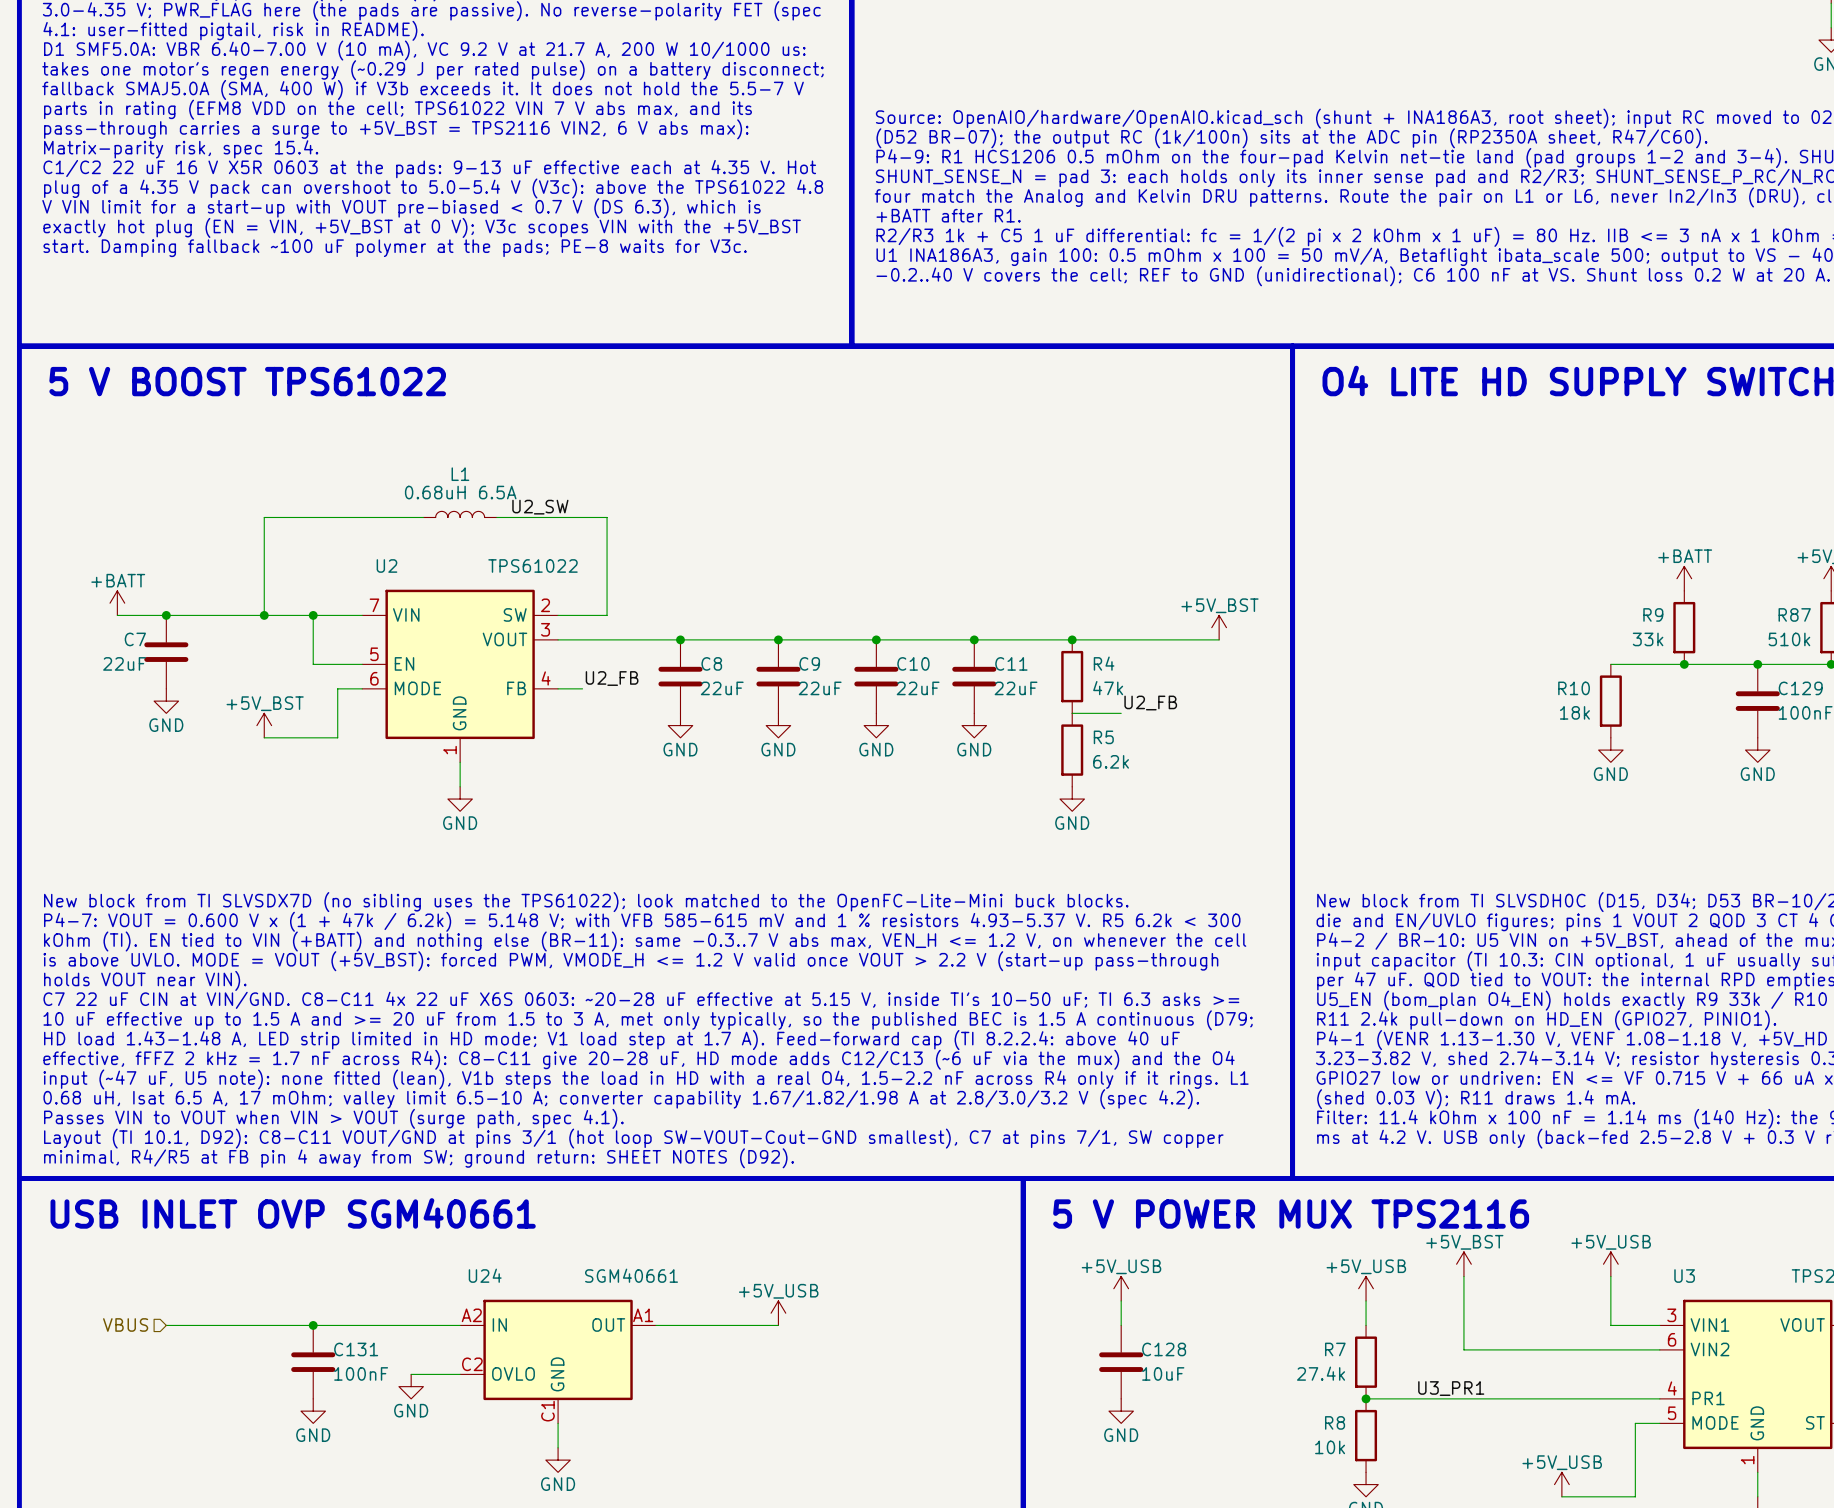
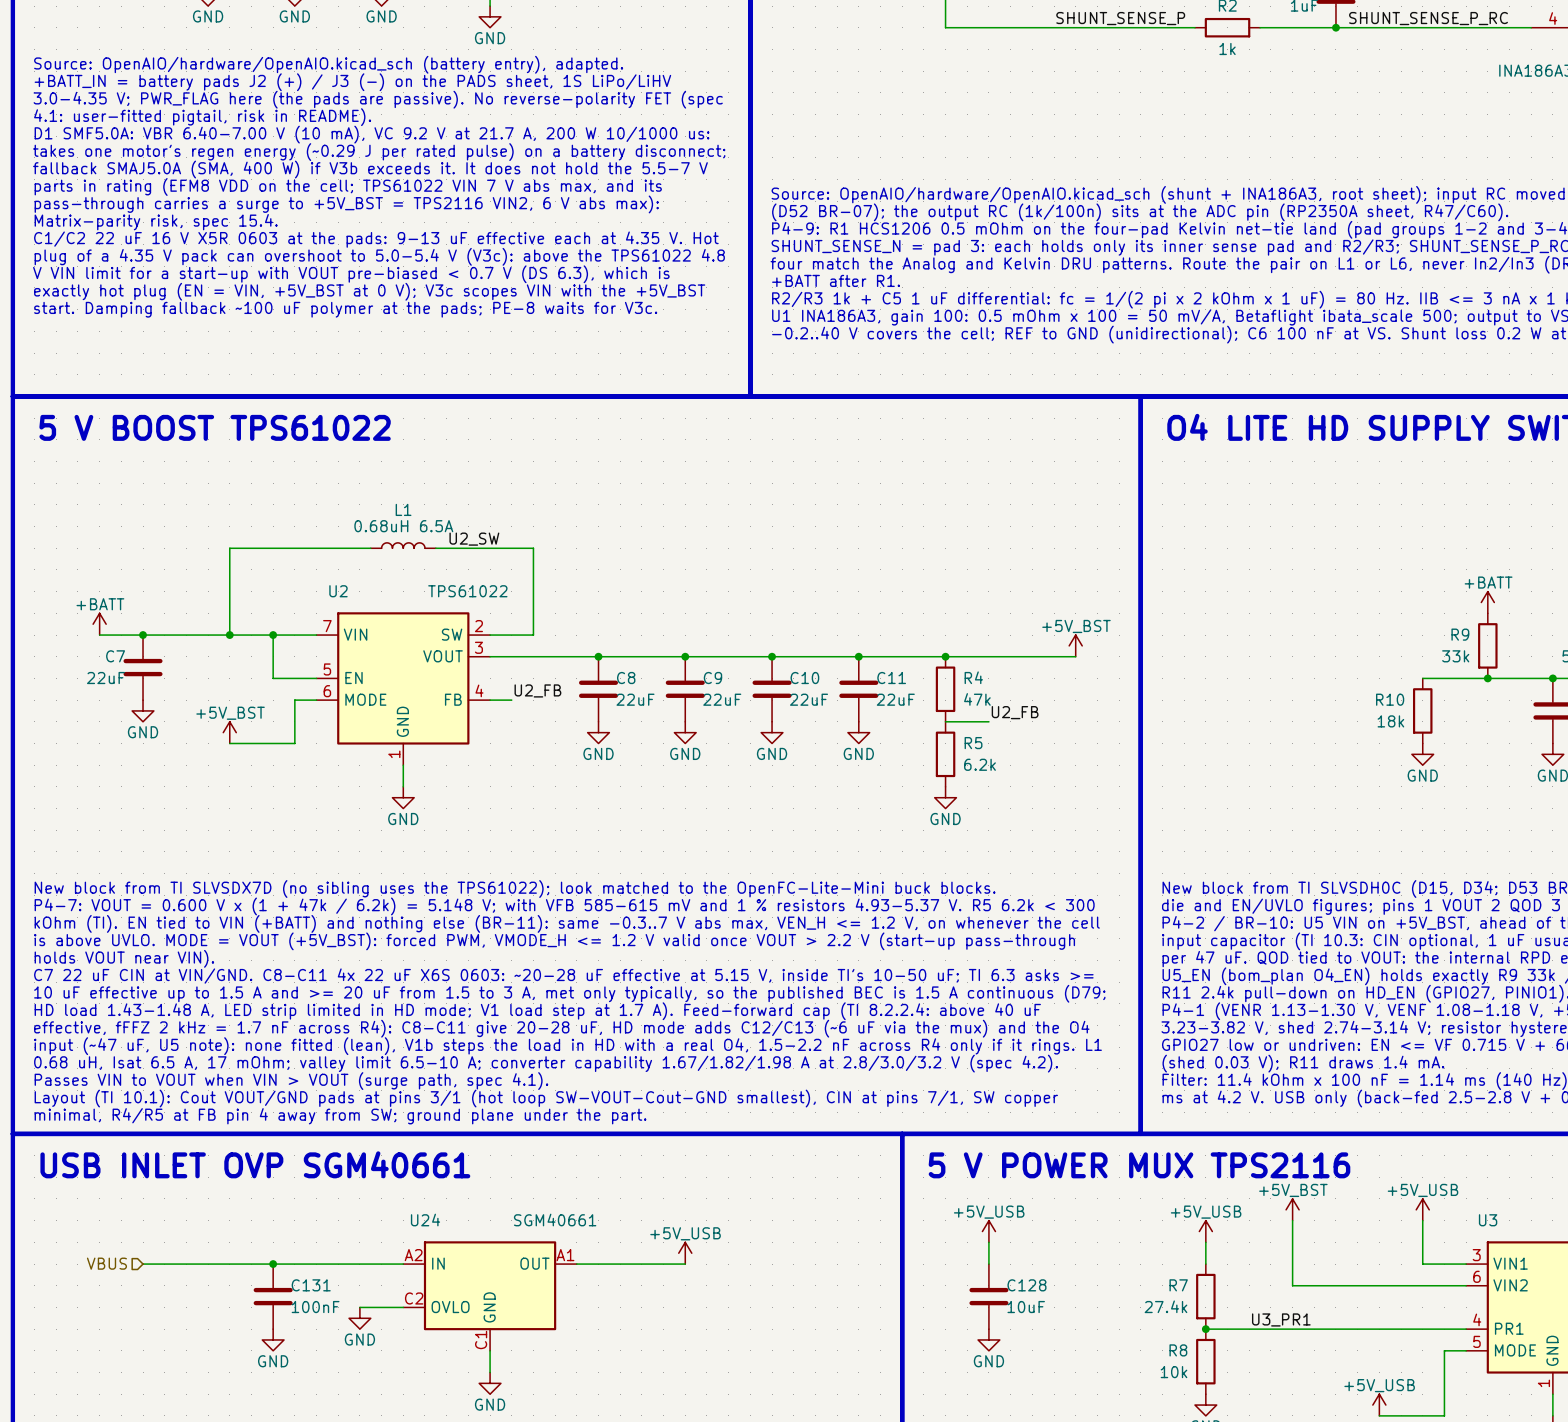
text: Layout (TI 10.1, D92): C8-C11 VOUT/GND at pins 3/1 (hot loop SW-VOUT-Cout-GND smallest), C7 at pins 7/1, SW copper (633, 1138) -> Layout (TI 10.1): Cout VOUT/GND pads at pins 3/1 (hot loop SW-VOUT-Cout-GND smallest), CIN at pins 7/1, SW copper (546, 1098)
text: minimal, R4/R5 at FB pin 4 away from SW; ground return: SHEET NOTES (D92). (418, 1158) -> minimal, R4/R5 at FB pin 4 away from SW; ground plane under the part. (340, 1116)

